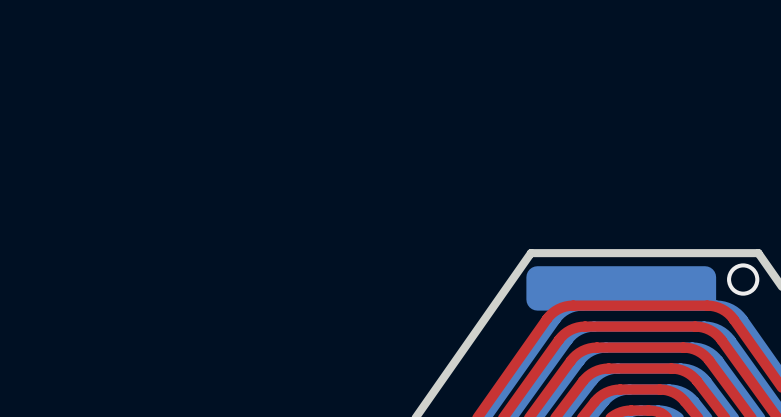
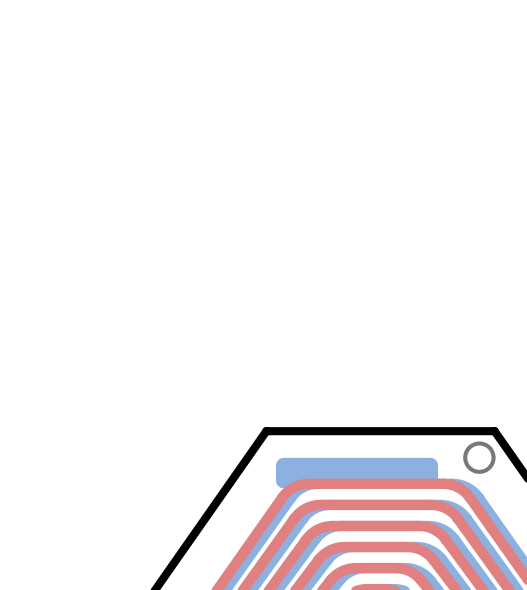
part footprint: [526, 266, 717, 311] -> [275, 457, 439, 489]

